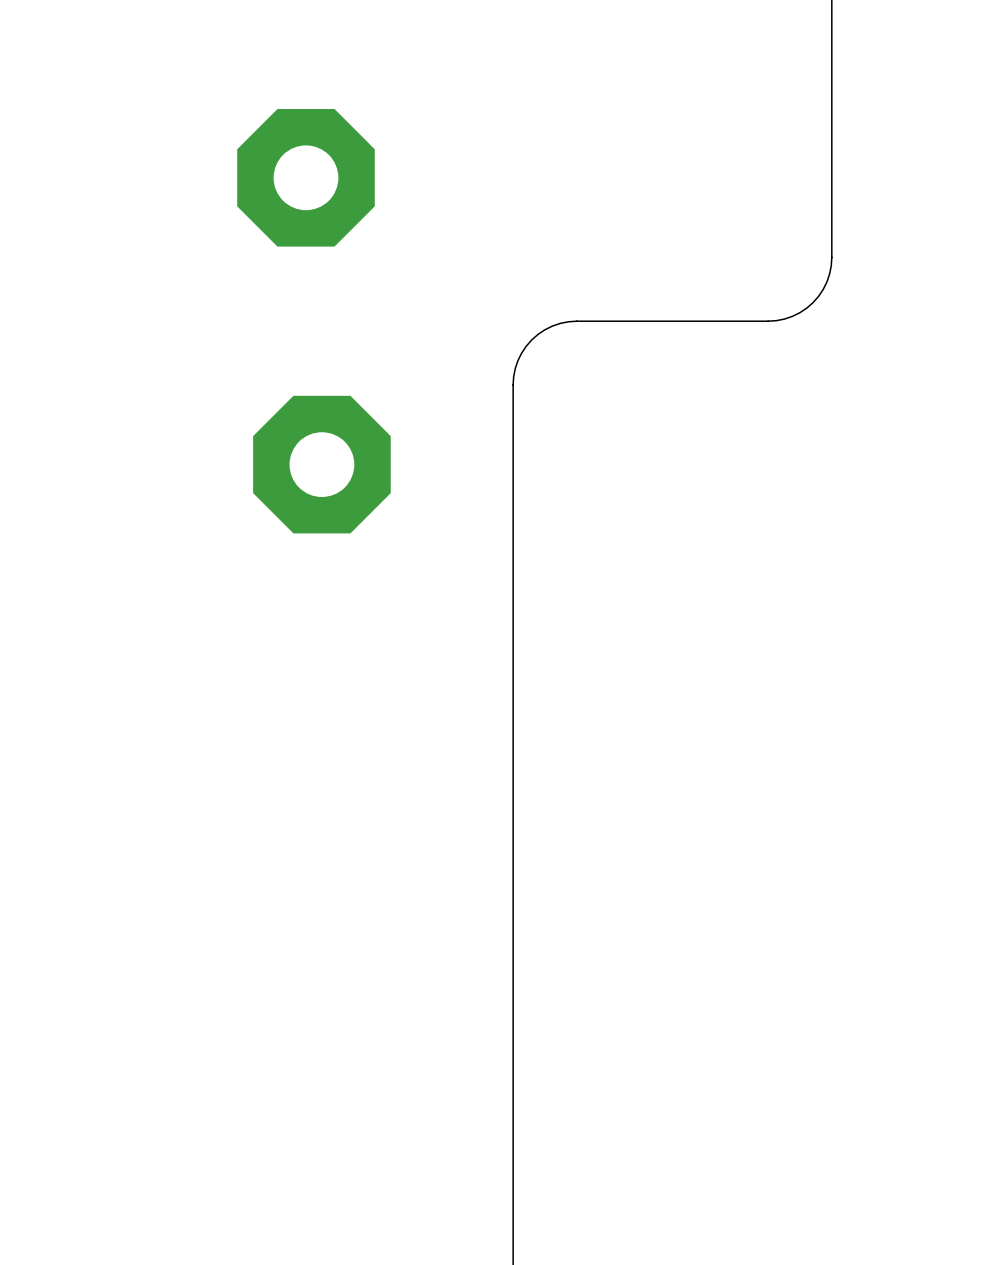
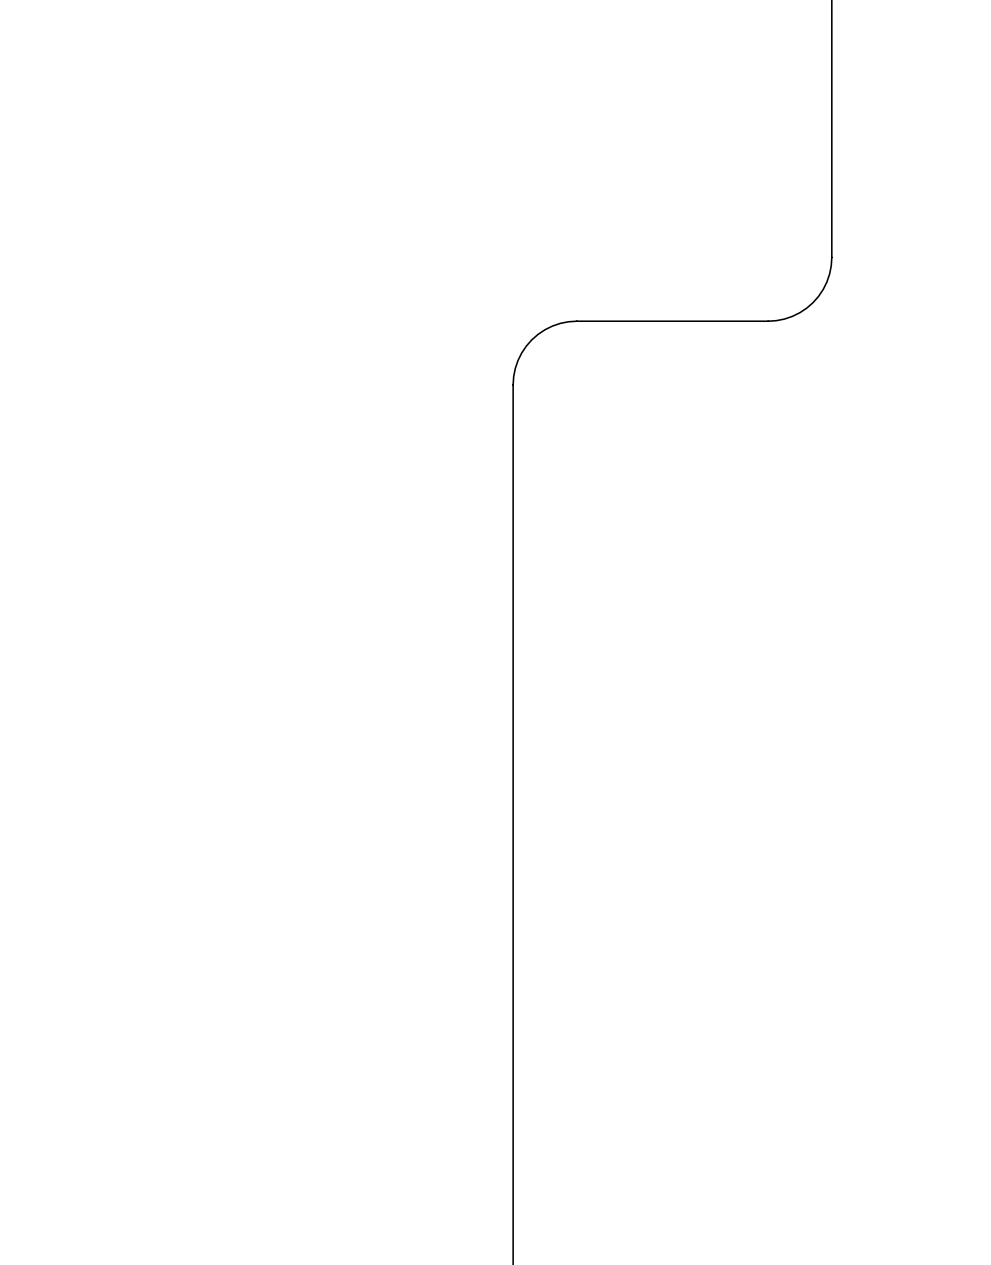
part: (305, 177) -> none
part: (321, 464) -> none

